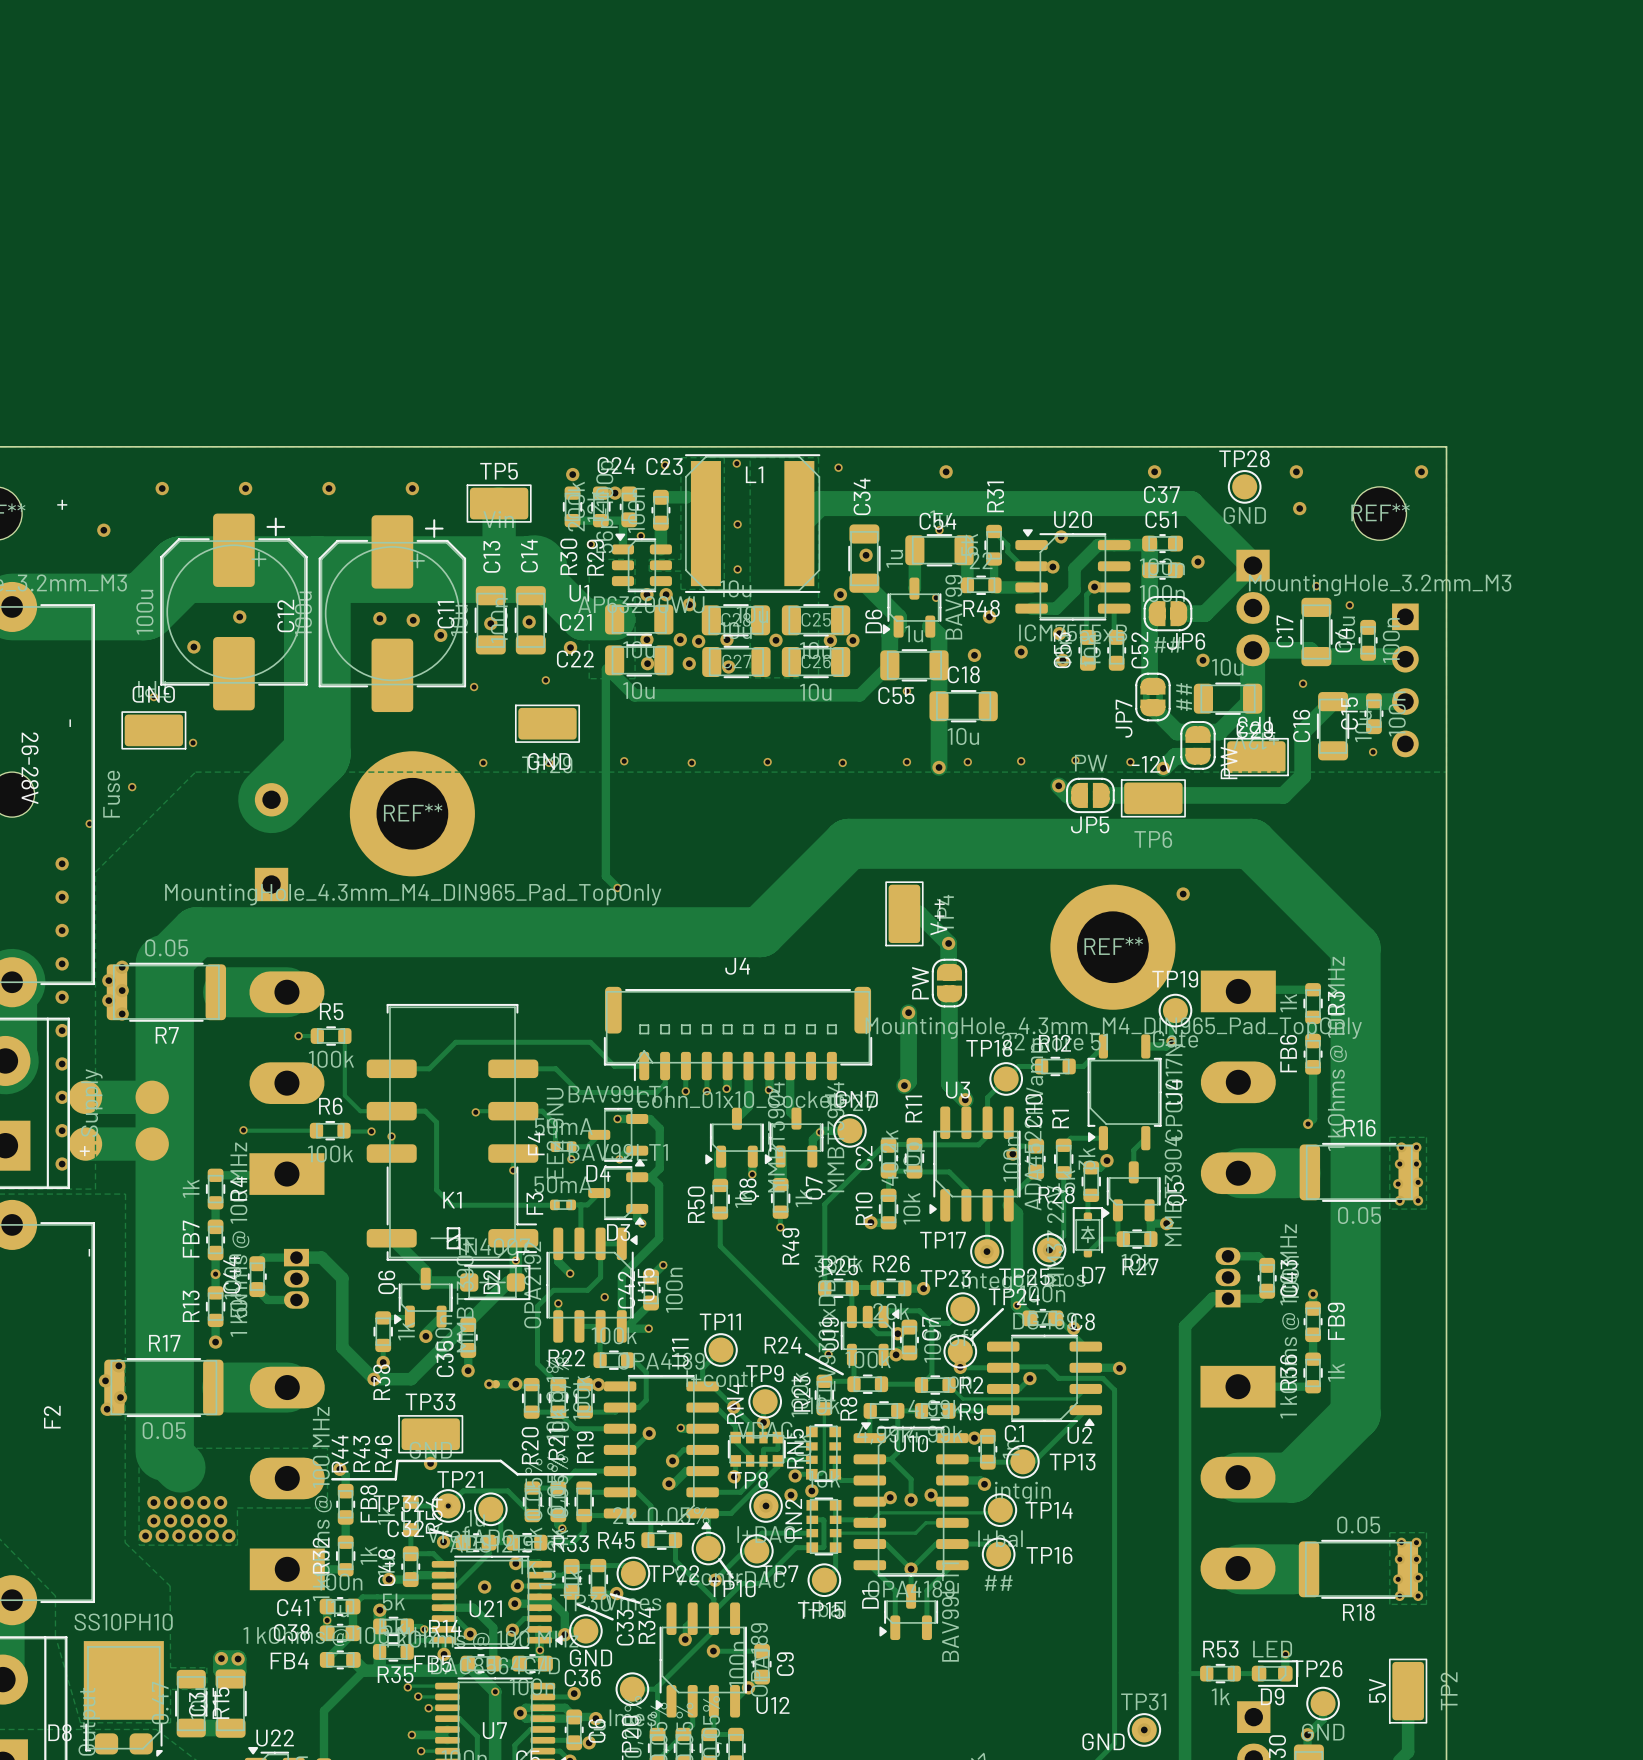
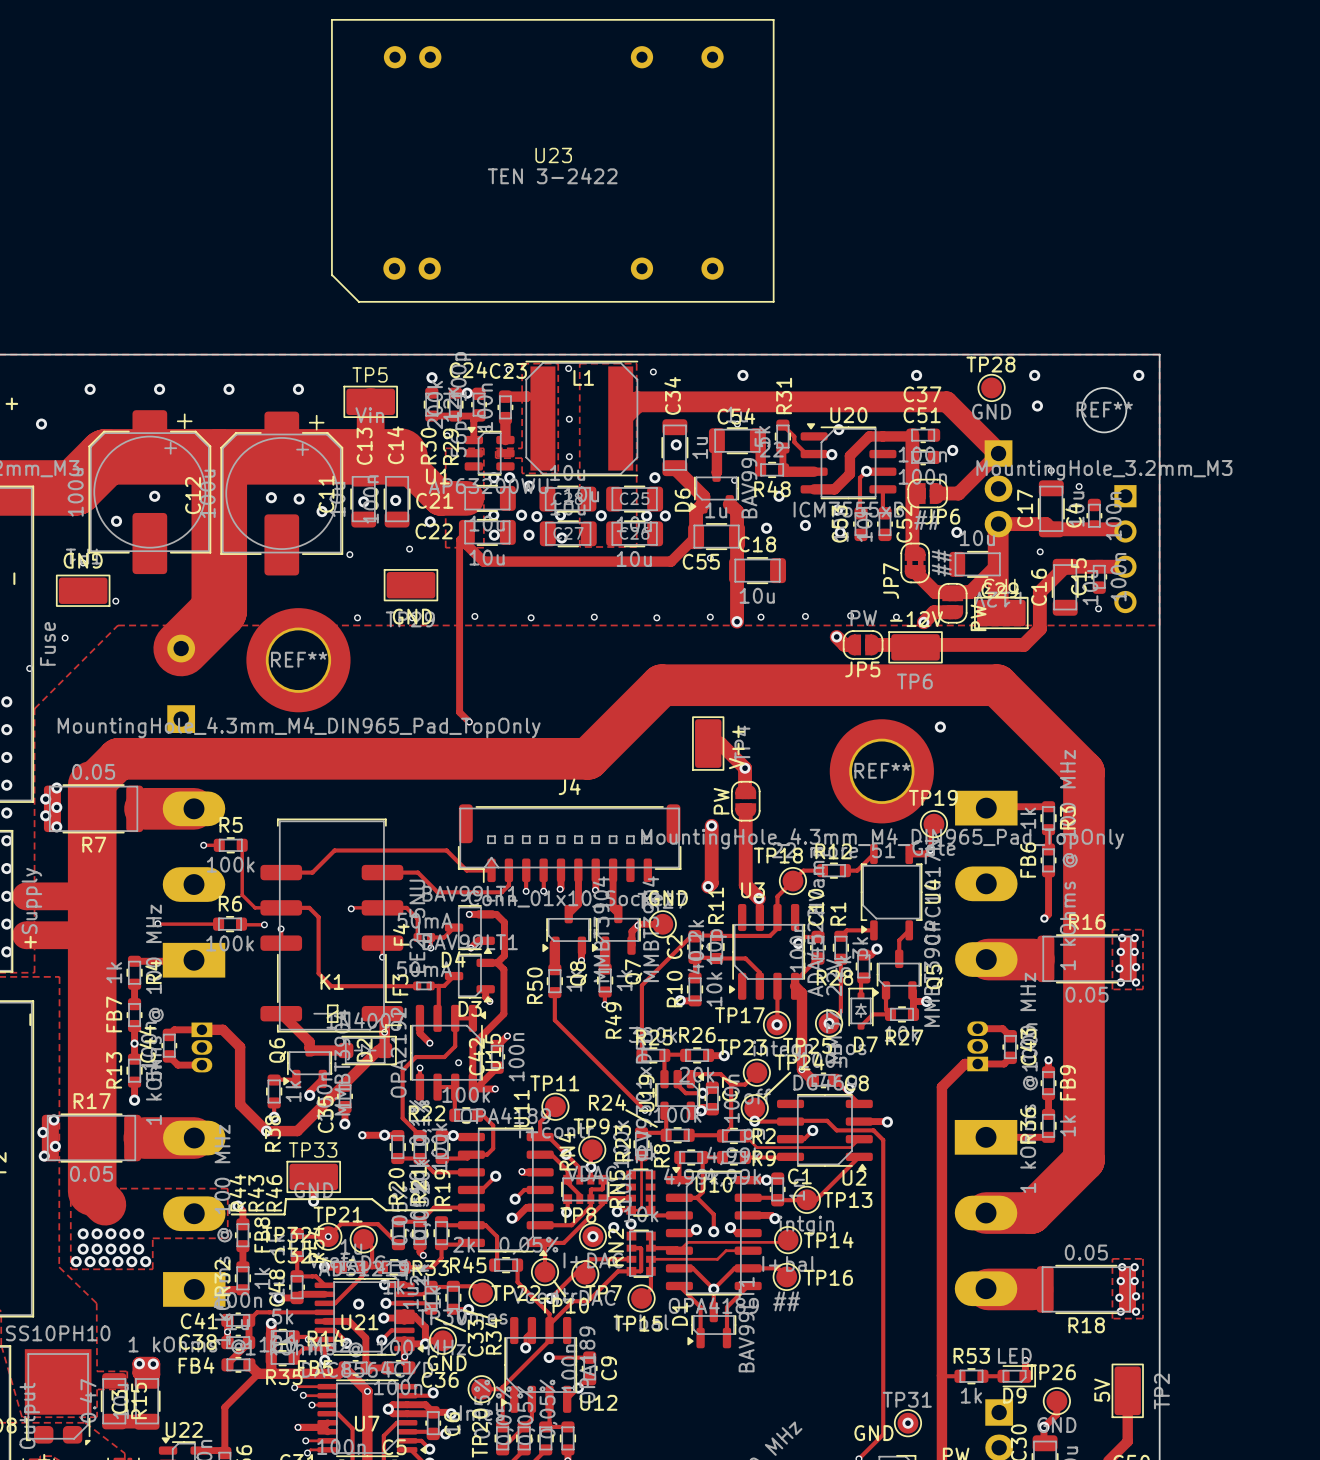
U23: none -> TEN 3-2422 (552, 160)

